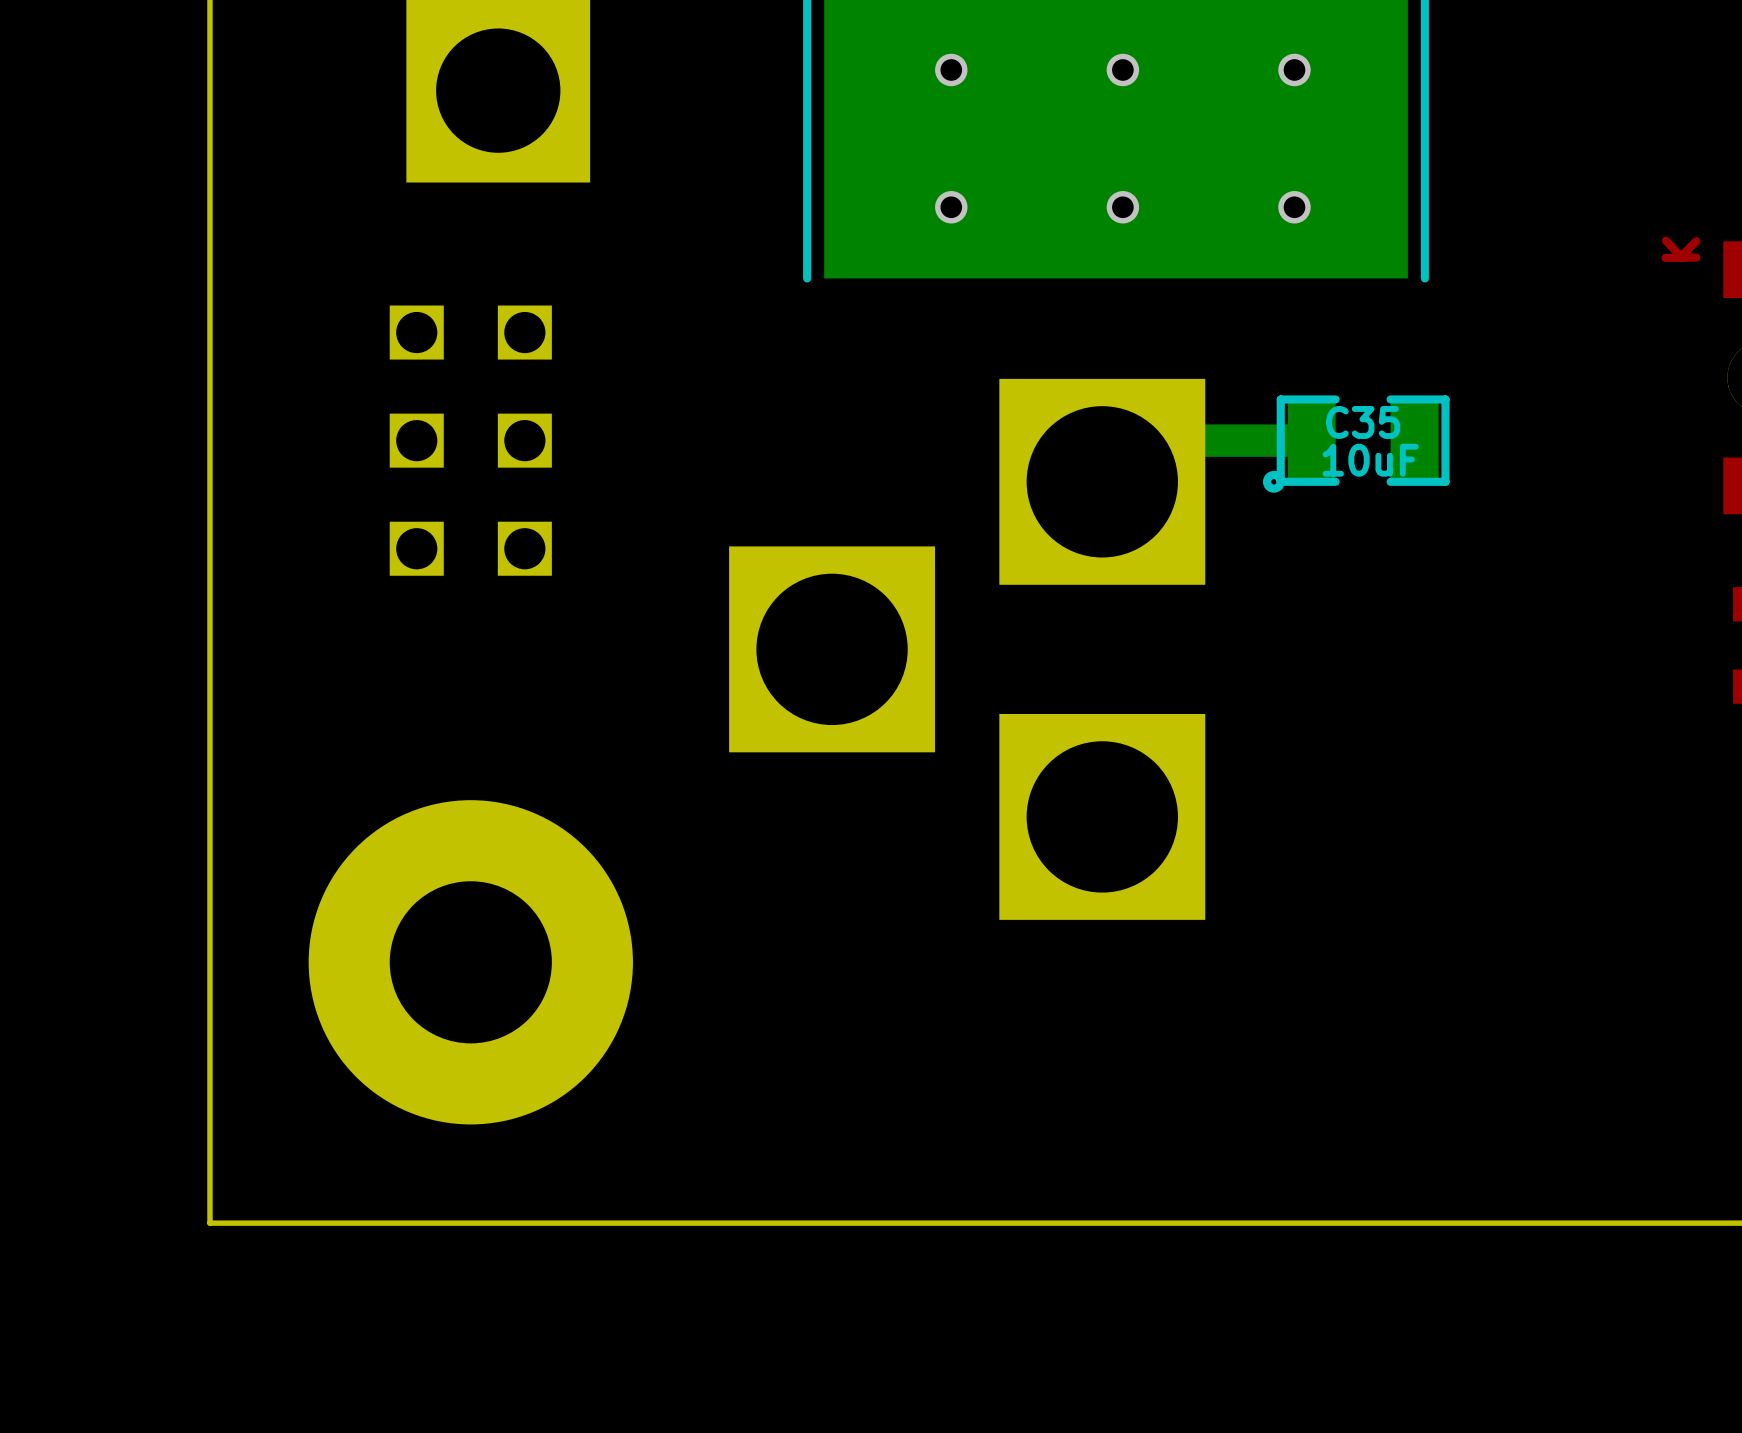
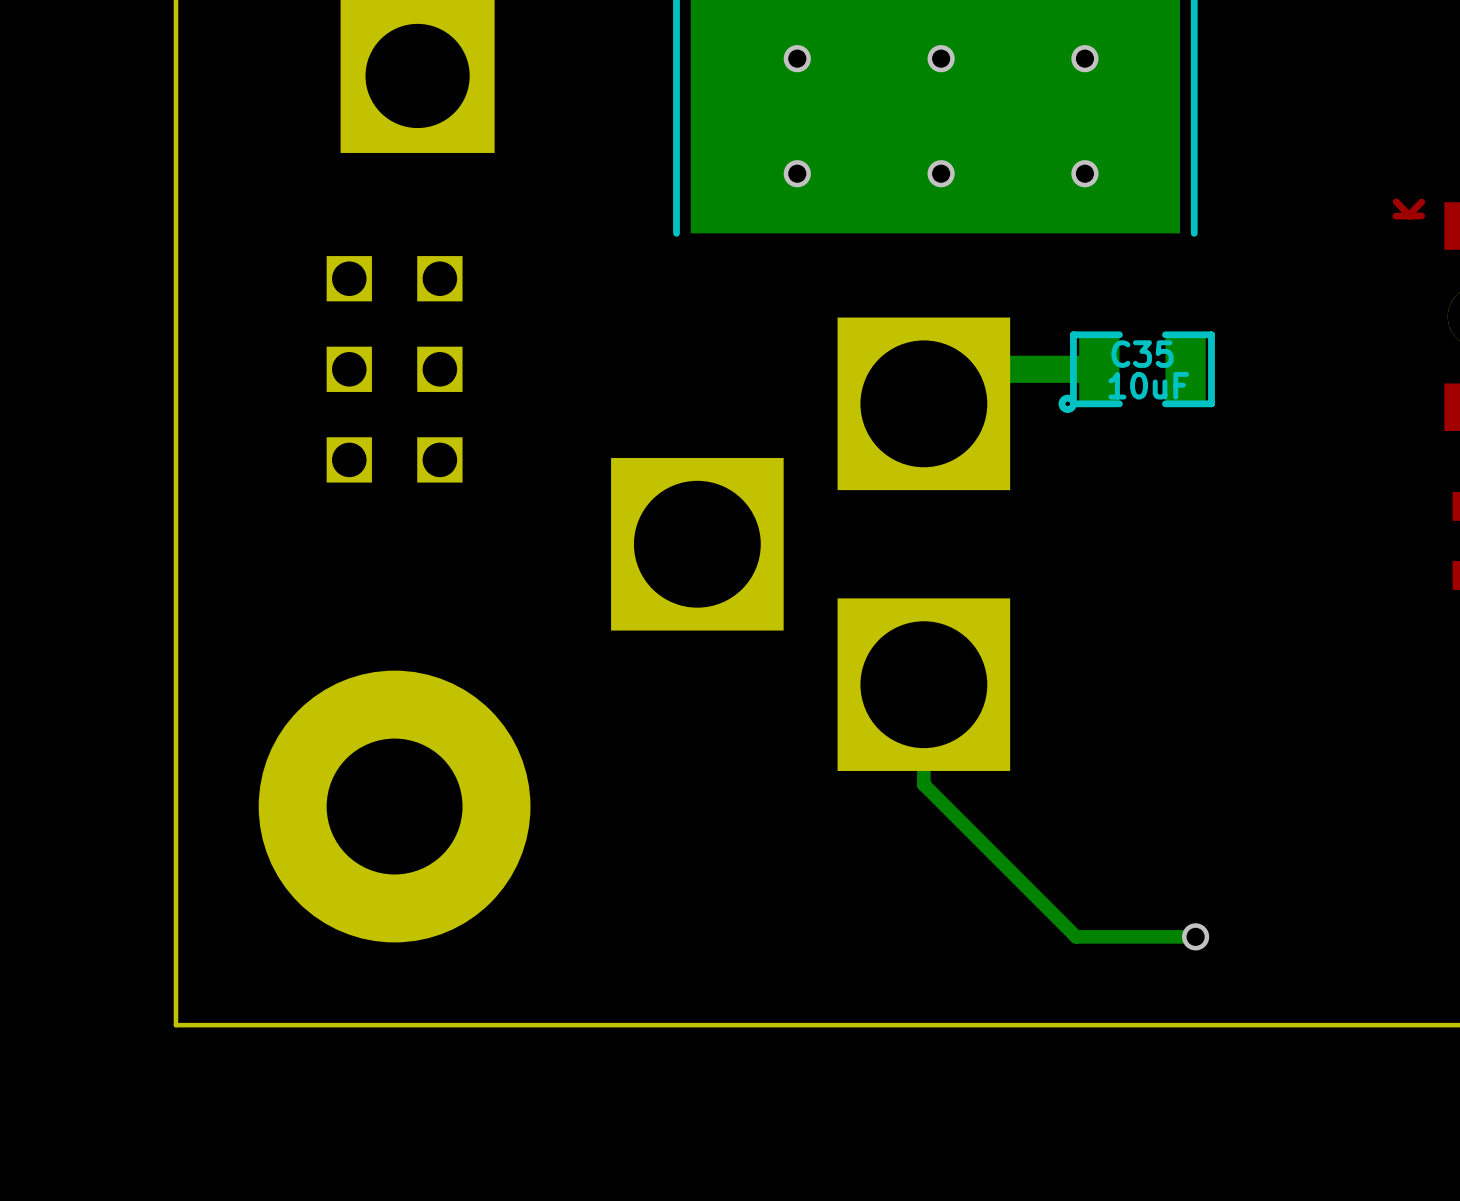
bottom track: none -> (923, 684) (923, 784) (1076, 936) (1195, 936)
via: none -> (1195, 936)

